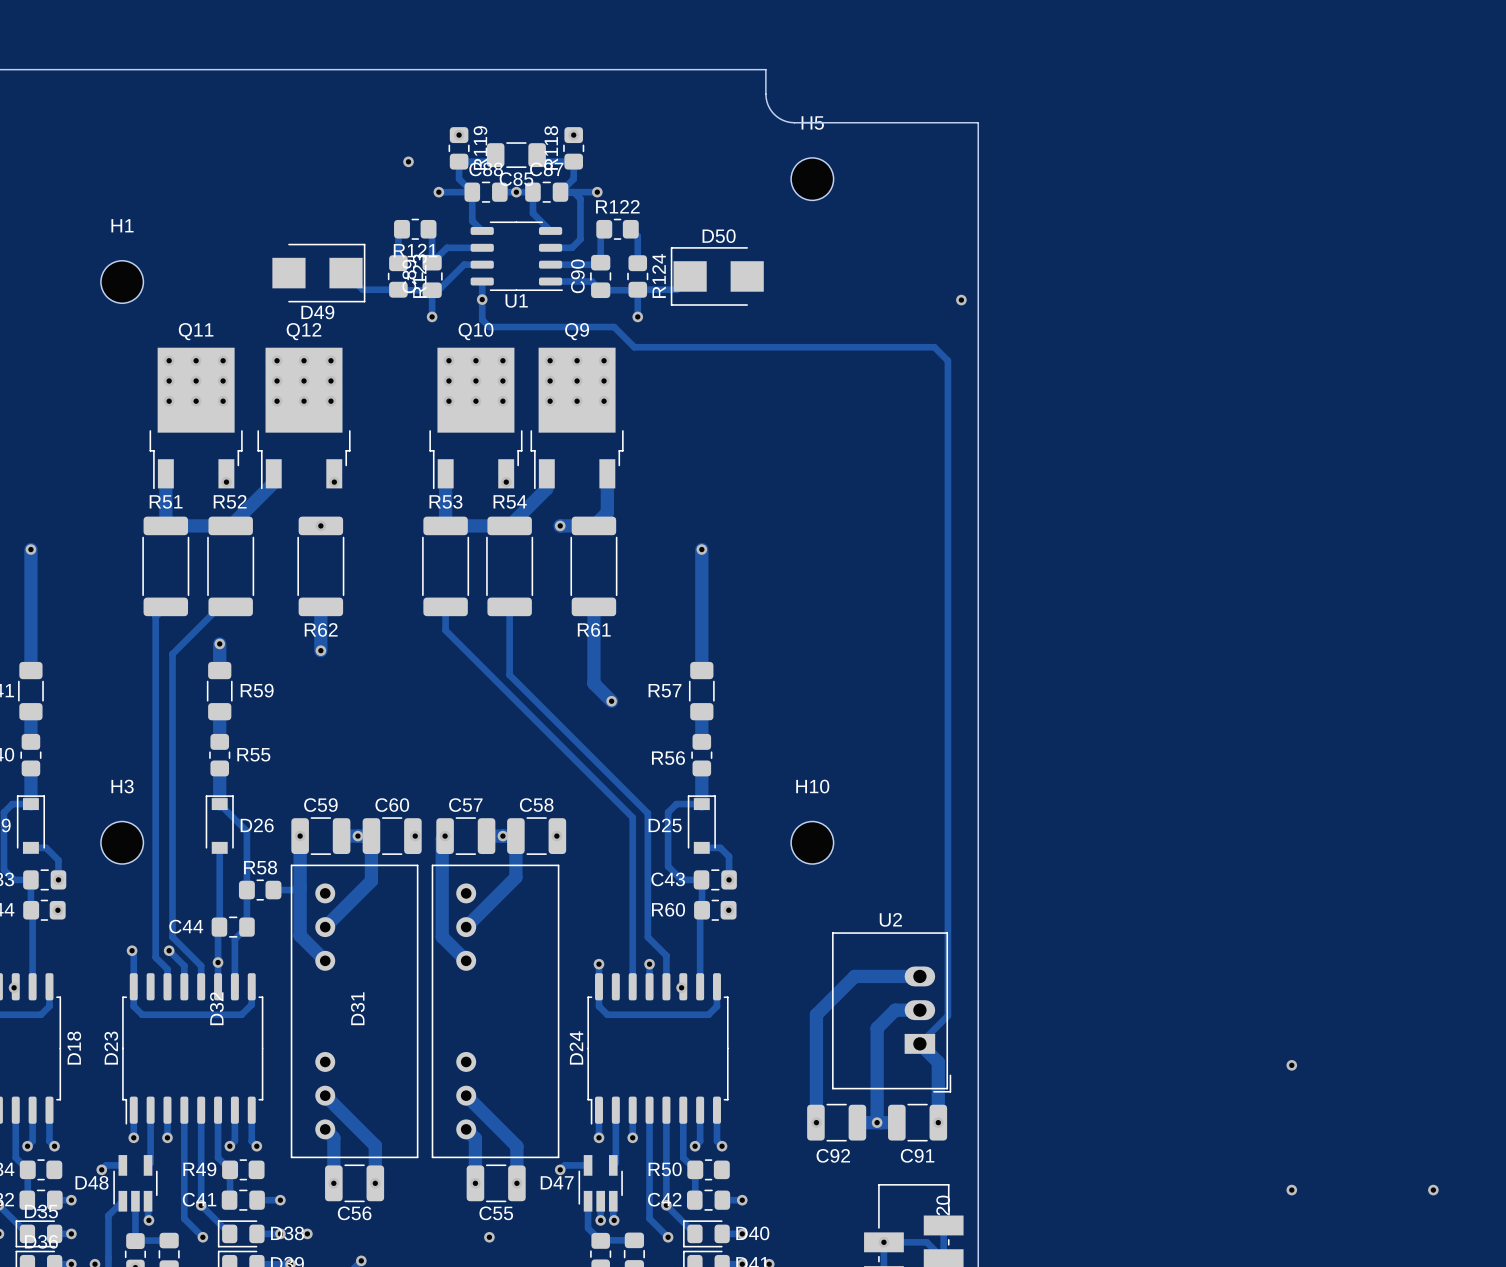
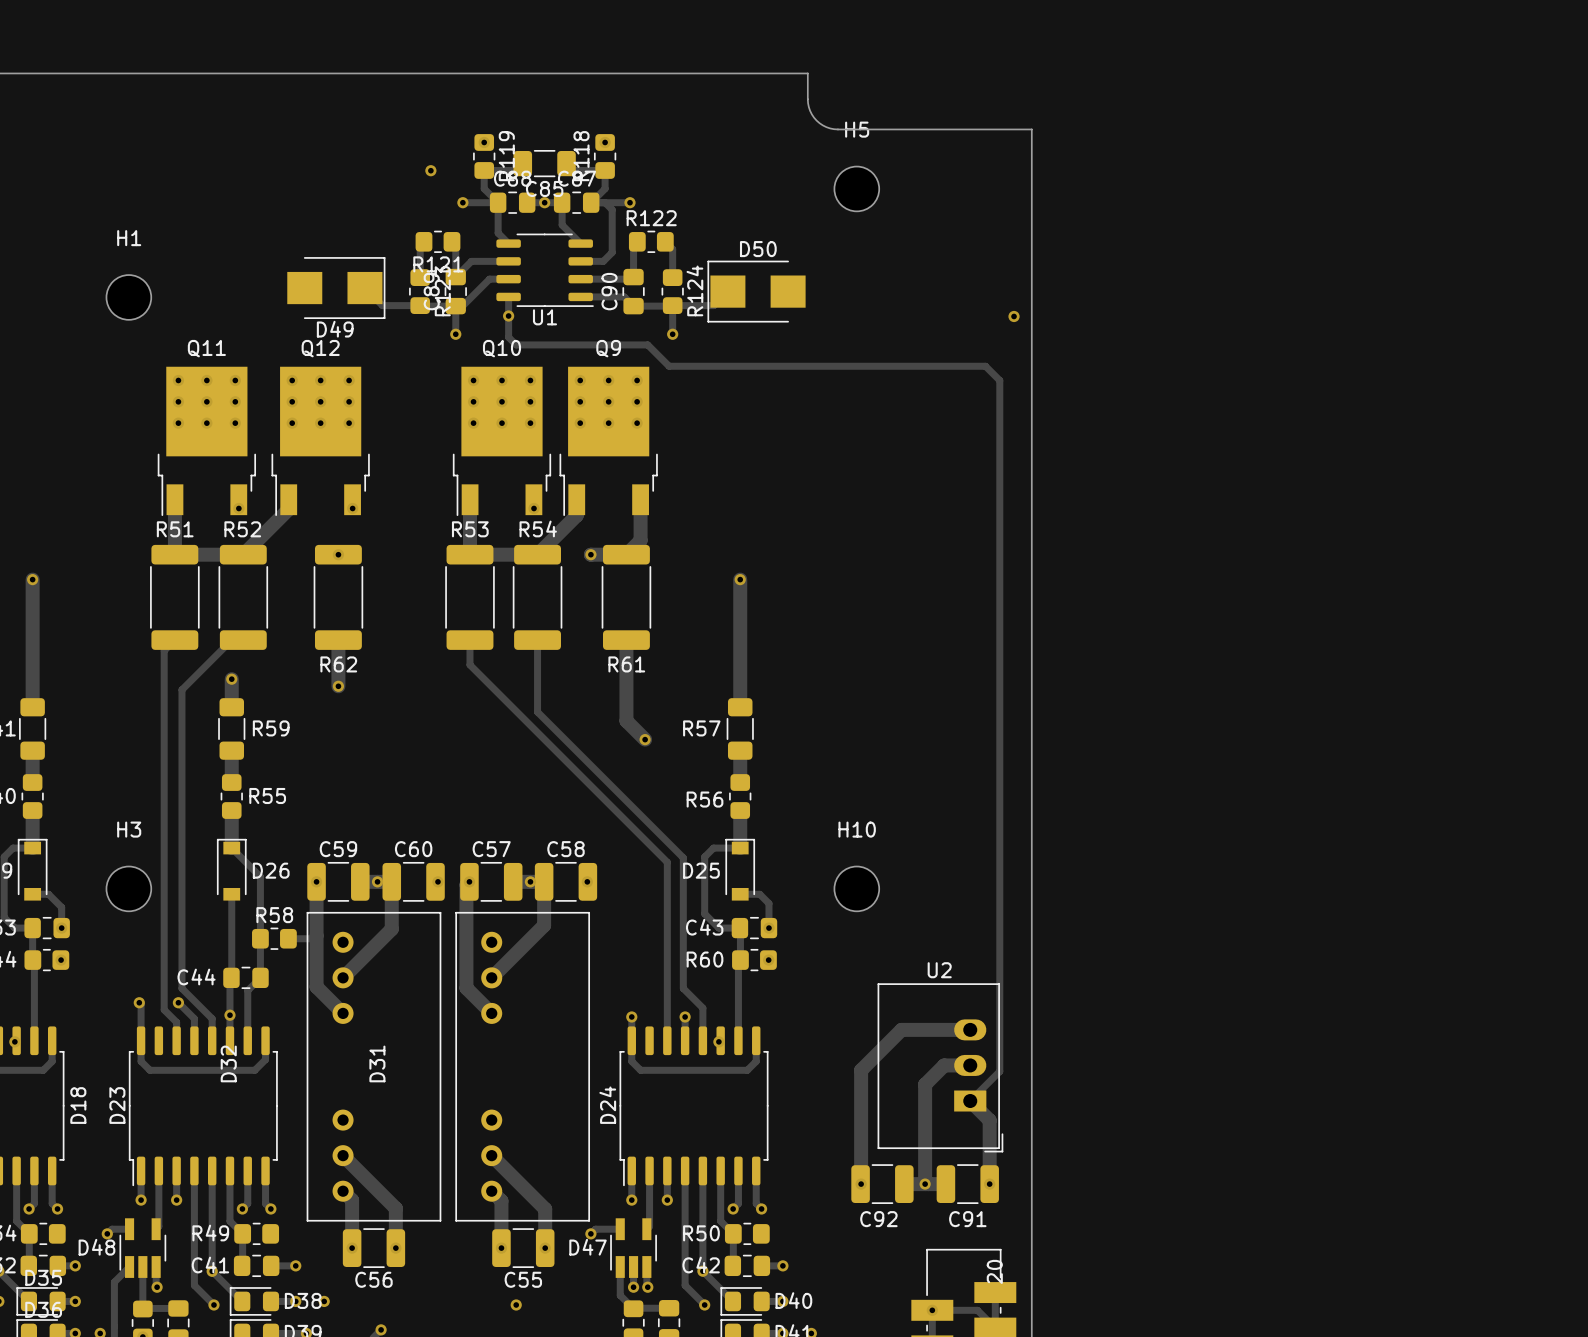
via: (1291, 1065) -> none
via: (1291, 1190) -> none
via: (1433, 1190) -> none

